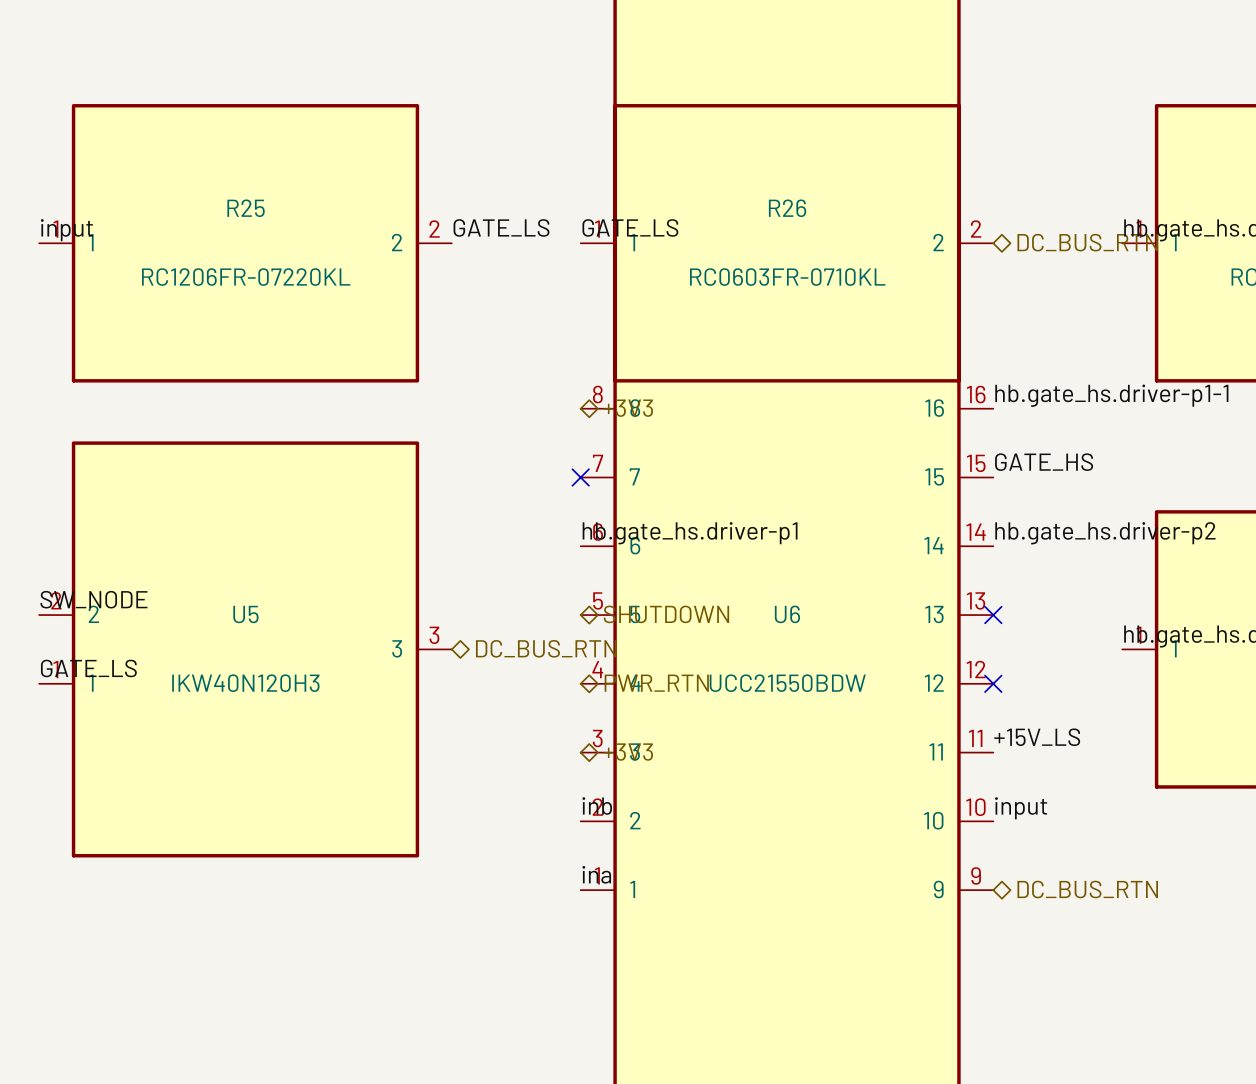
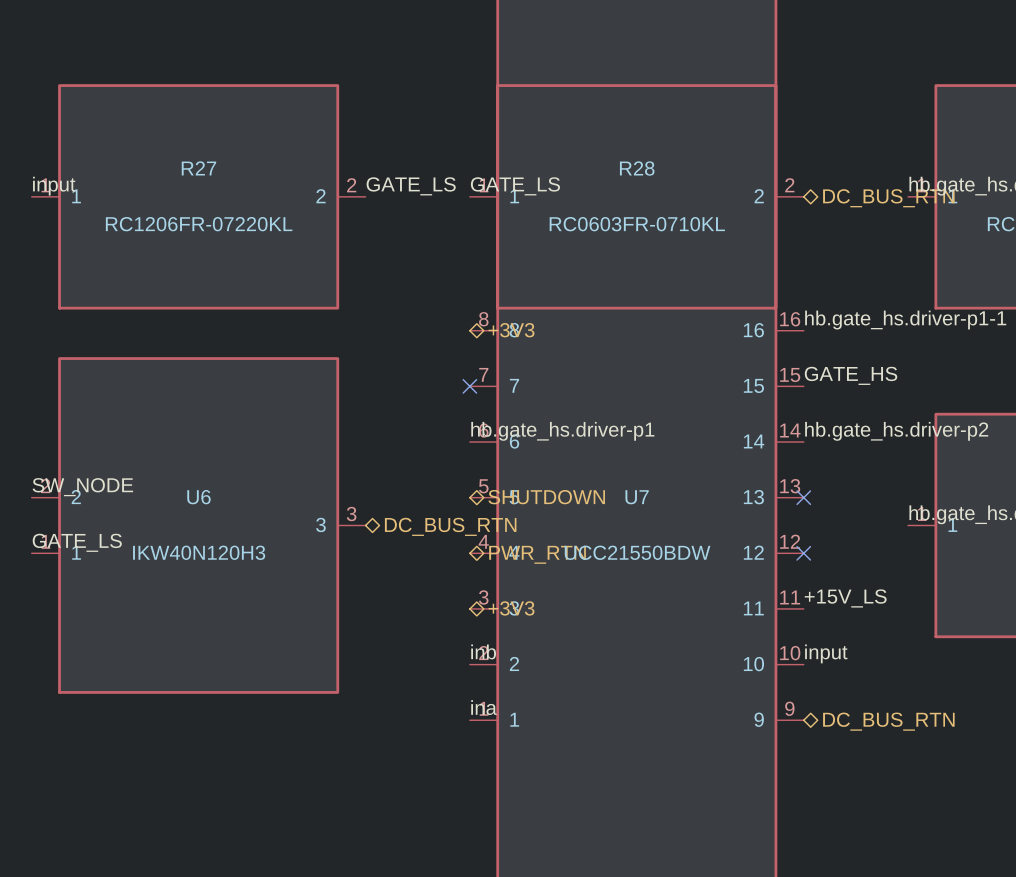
R25 name: R25 (246, 208) -> R27 (198, 168)
R26 name: R26 (787, 208) -> R28 (637, 168)
U5 name: U5 (245, 614) -> U6 (198, 497)
U6 name: U6 (787, 614) -> U7 (637, 497)

